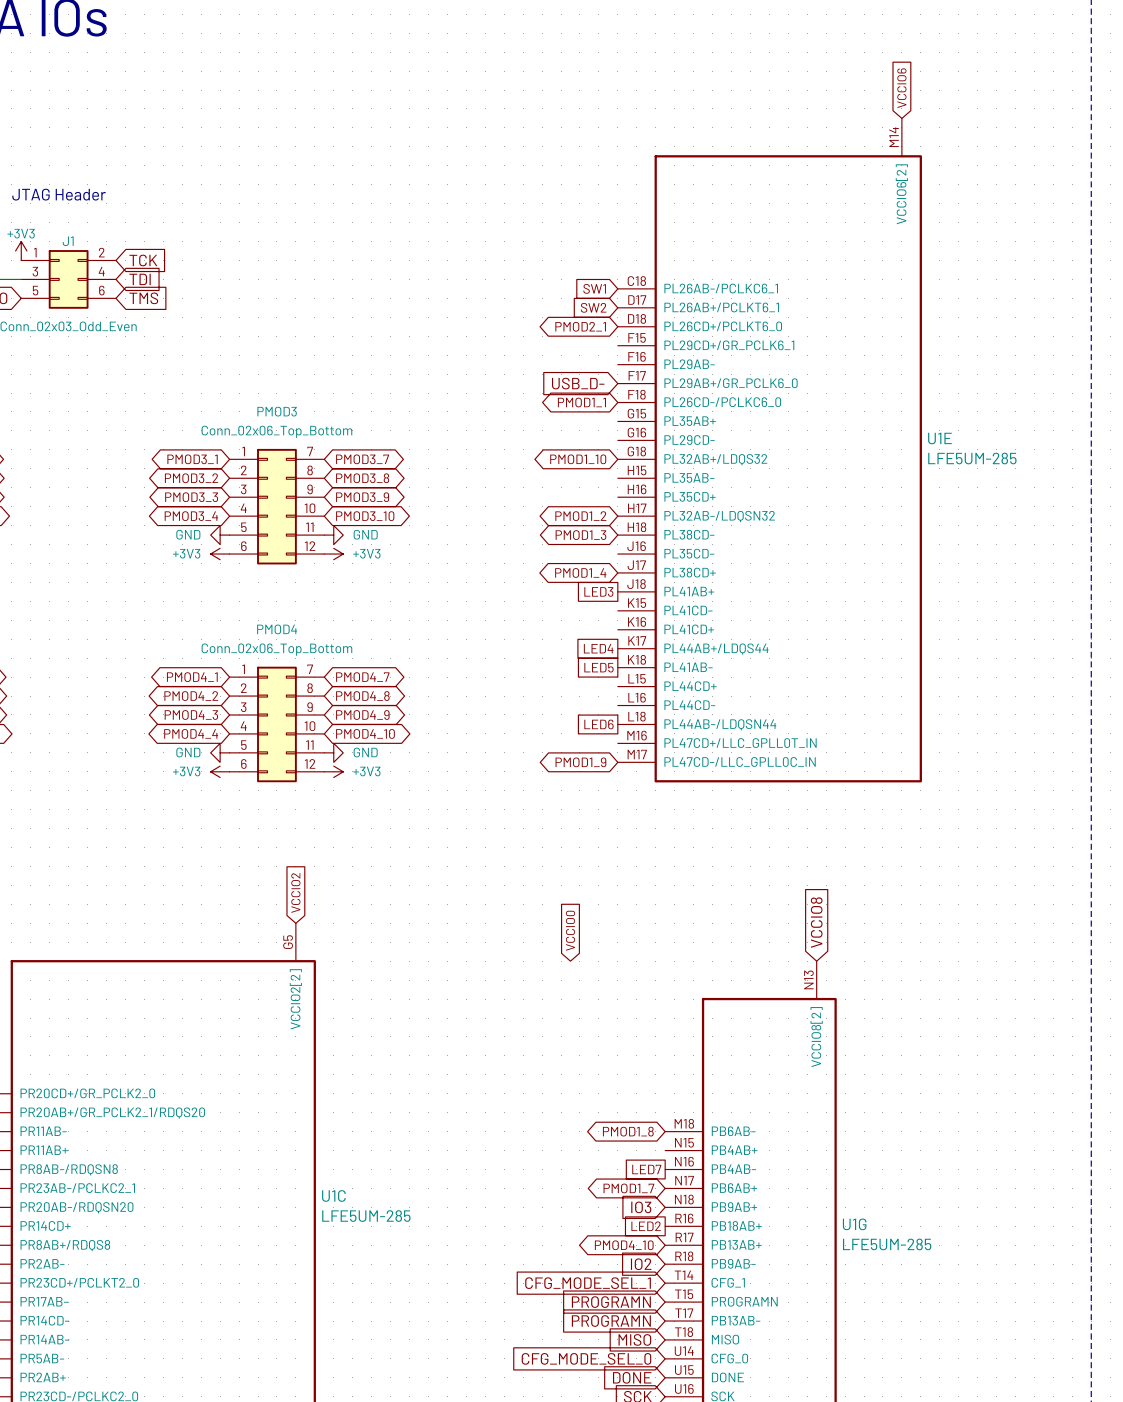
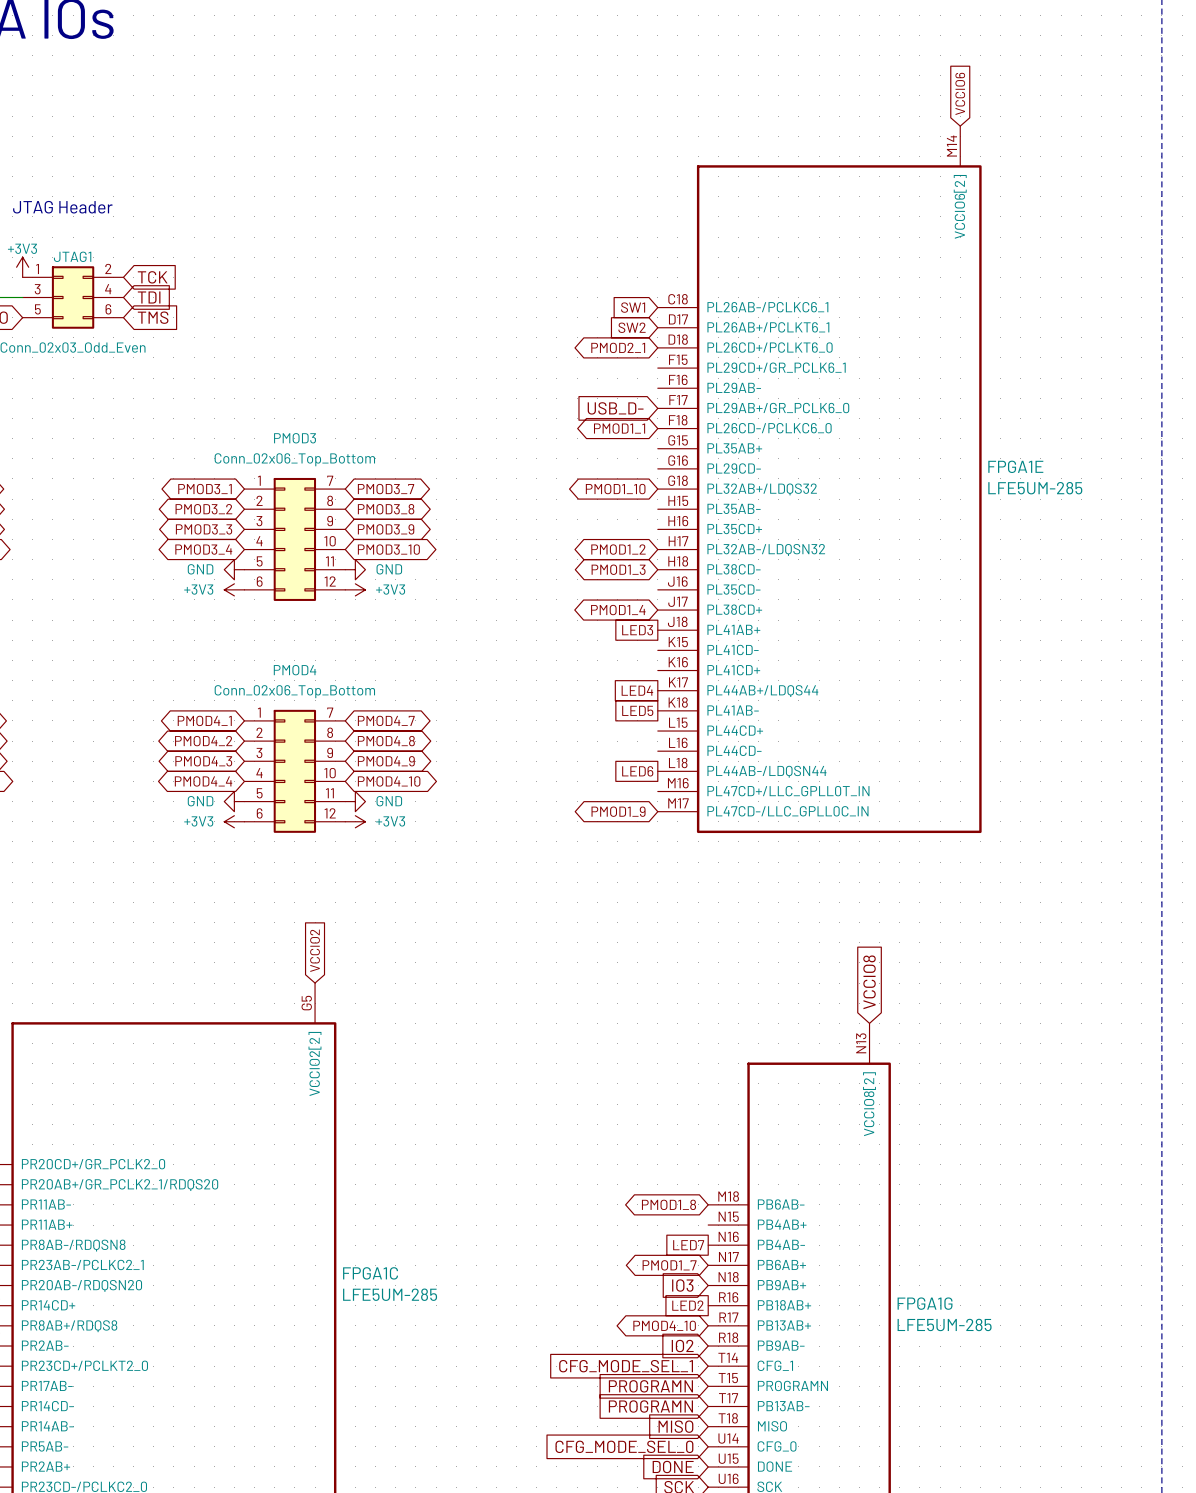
J1 name: J1 (68, 241) -> JTAG1 (72, 256)
U1E name: U1E (939, 438) -> FPGA1E (1015, 466)
global label: VCCIO0 (570, 930) -> none
U1C name: U1C (333, 1195) -> FPGA1C (370, 1273)
U1G name: U1G (854, 1224) -> FPGA1G (925, 1303)

